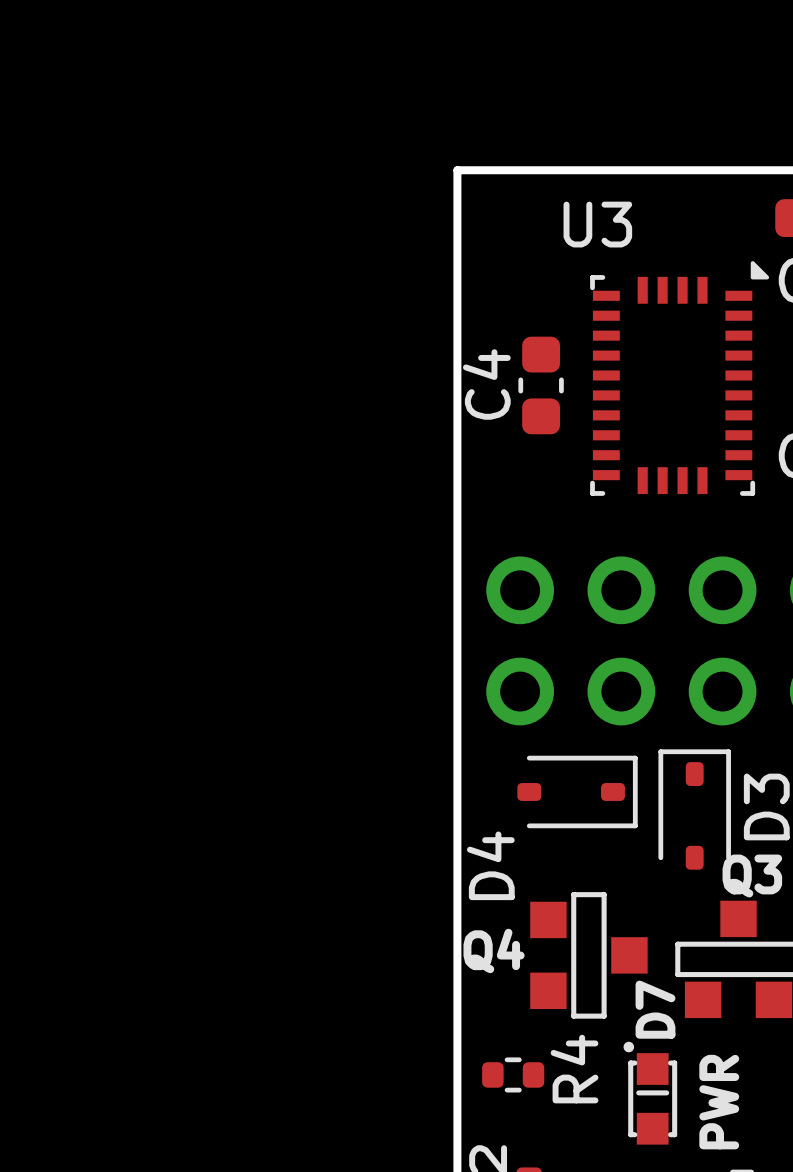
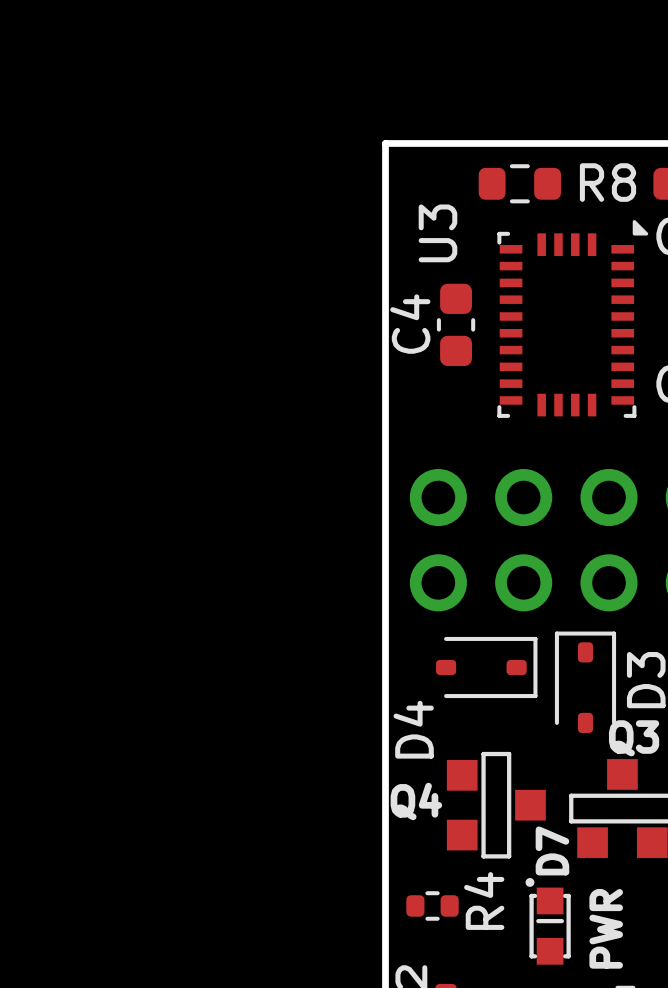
R8: none -> (519, 183)
U3 name rotation: 0° (597, 224) -> 90° counterclockwise (437, 233)

